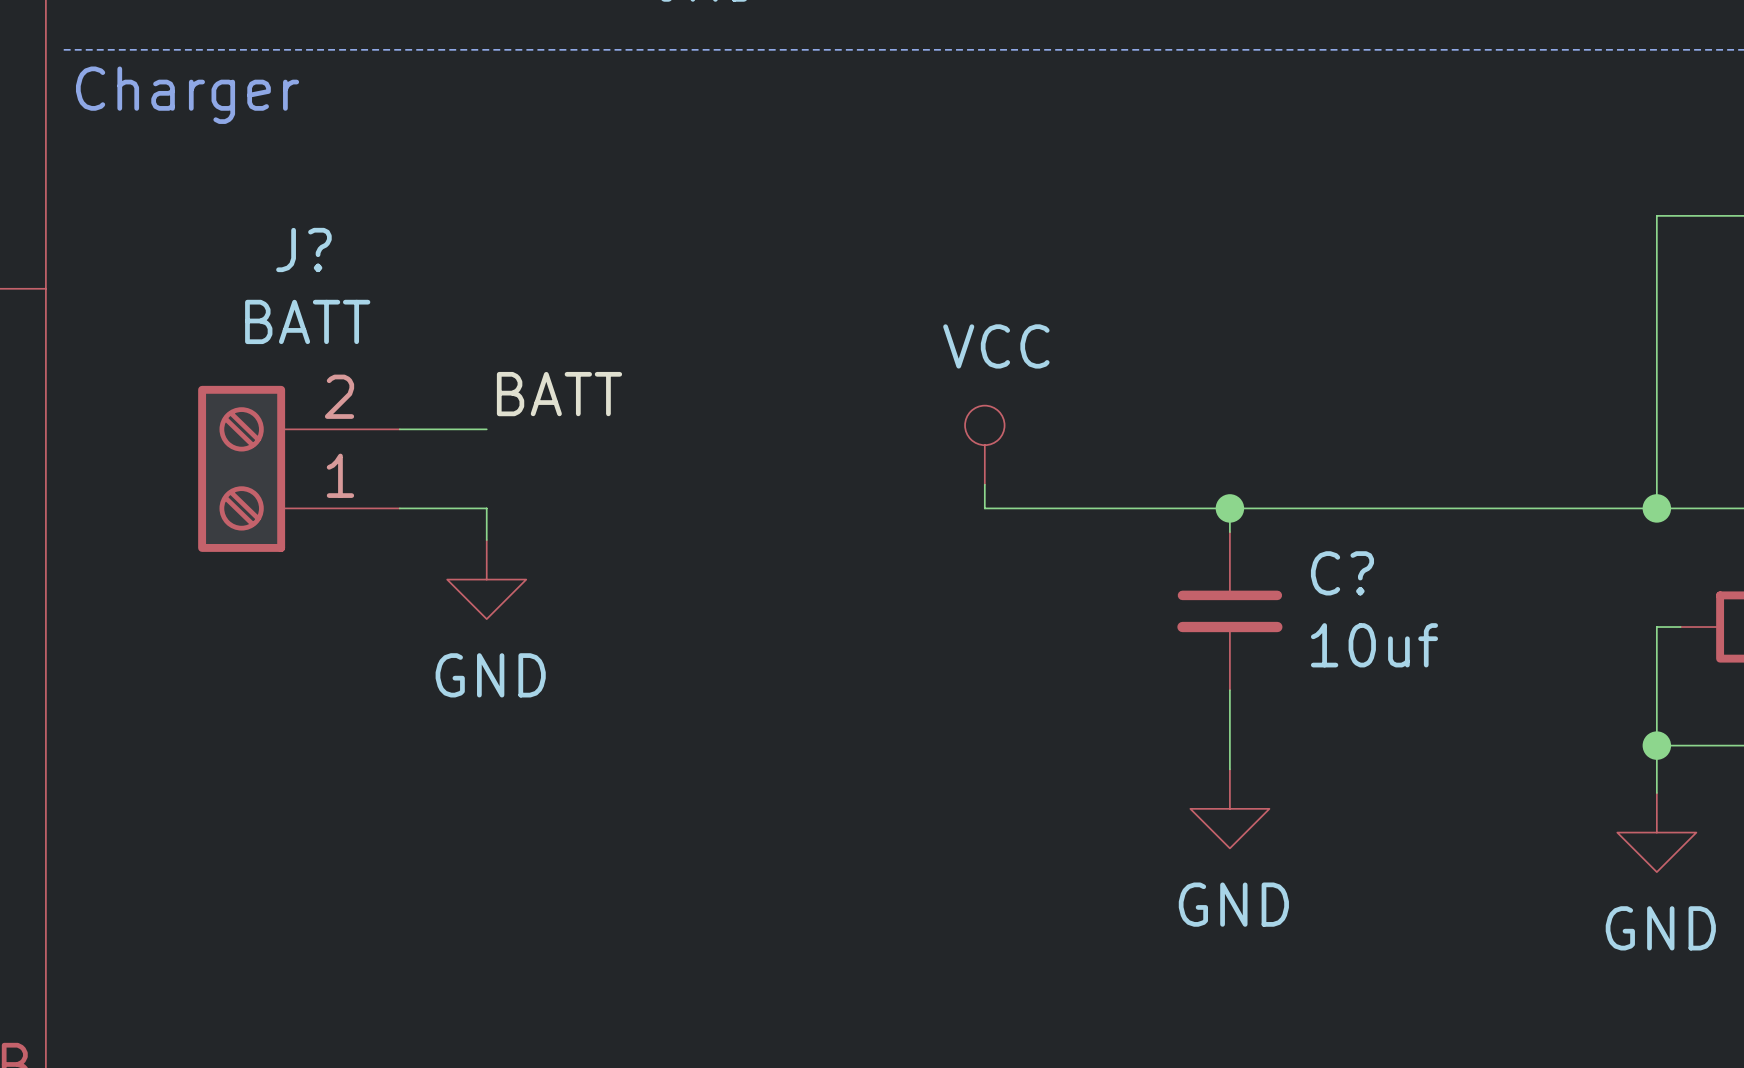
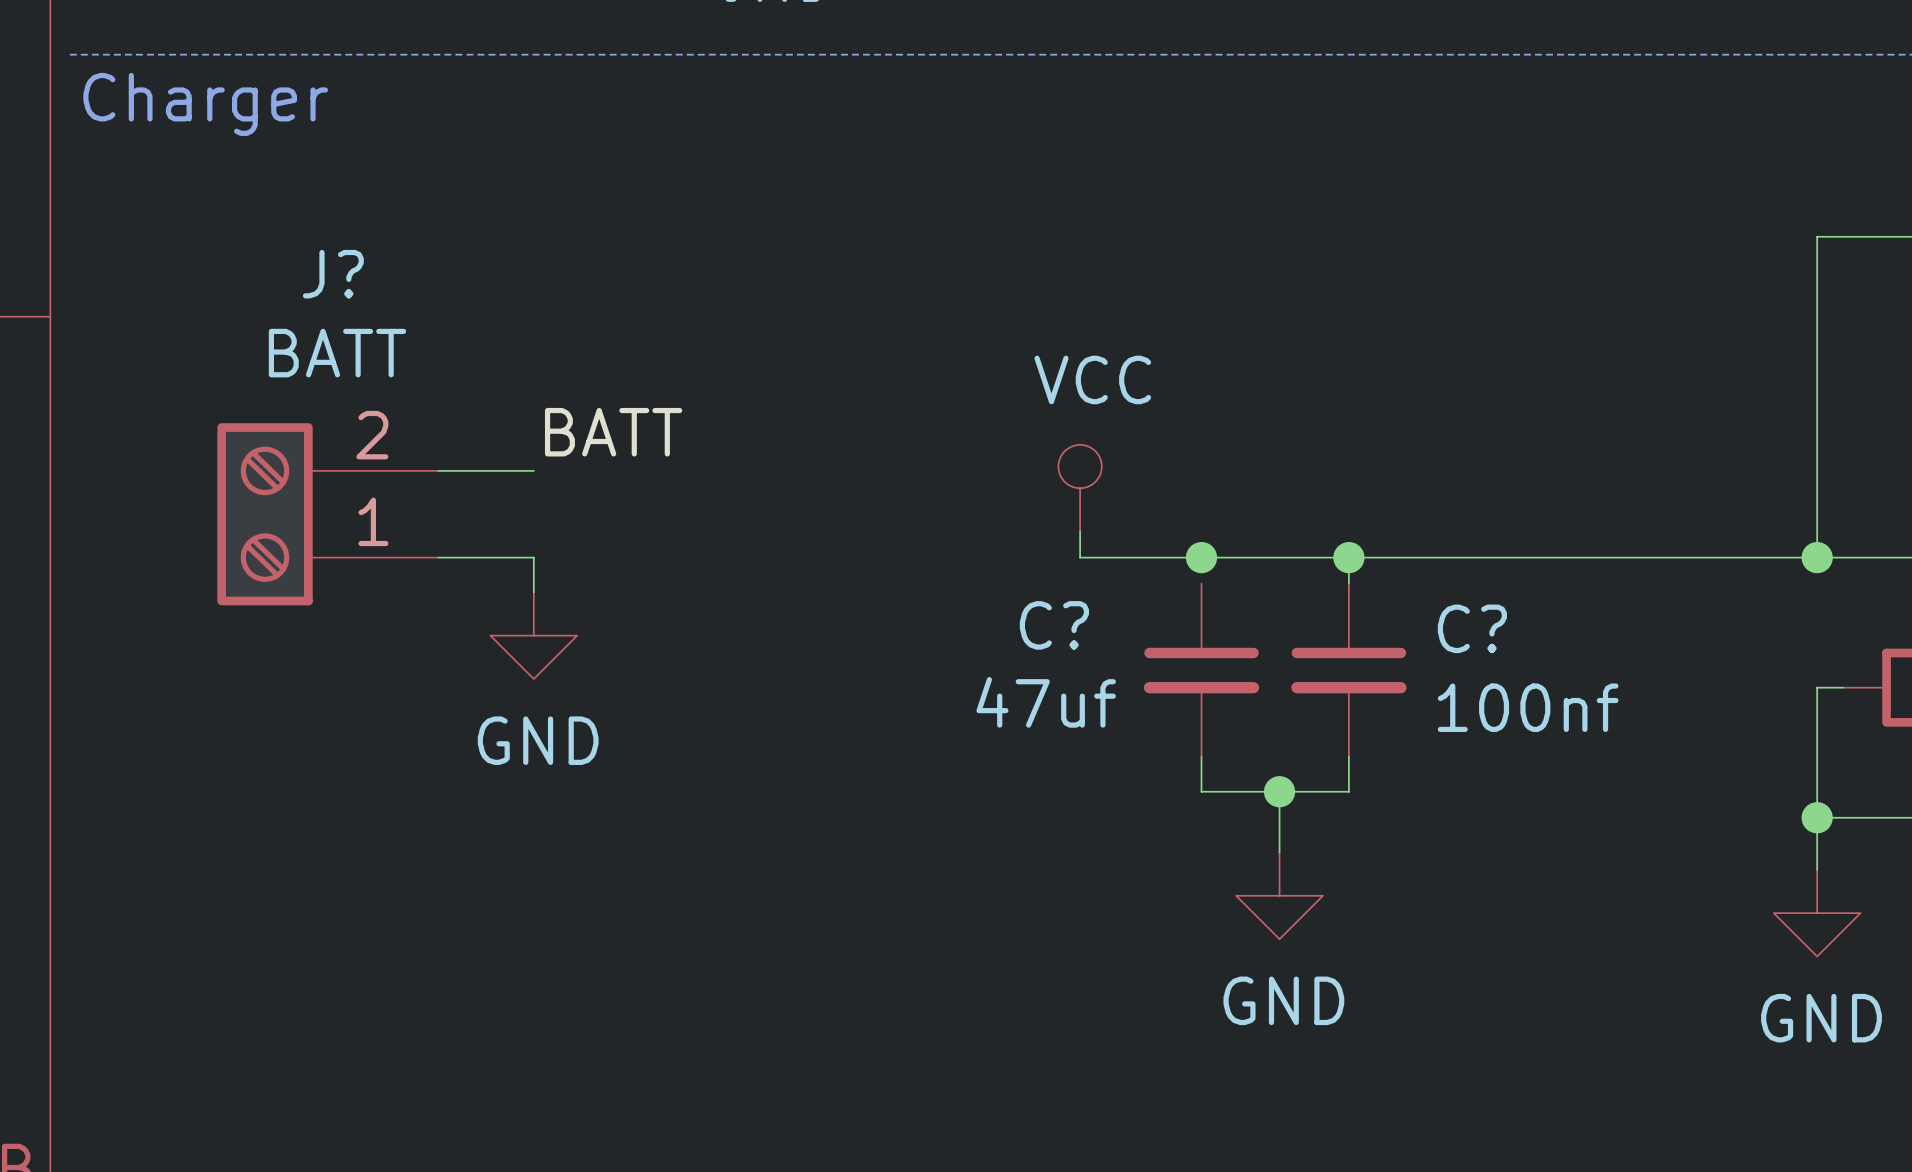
junction: none -> (1201, 557)
C?: none -> 47uf (1201, 670)
C? value: 10uf (1374, 645) -> 100nf (1528, 707)
wire: none -> (1279, 791) (1279, 852)
junction: none -> (1279, 791)
wire: (1229, 721) (1229, 769) -> (1348, 791) (1201, 791) (1201, 757)
power symbol position: GND (1229, 808) -> GND (1279, 895)

